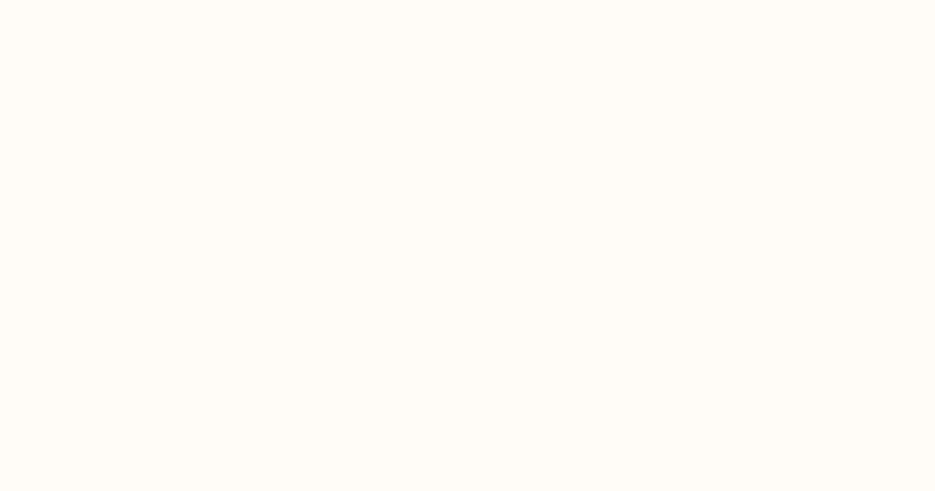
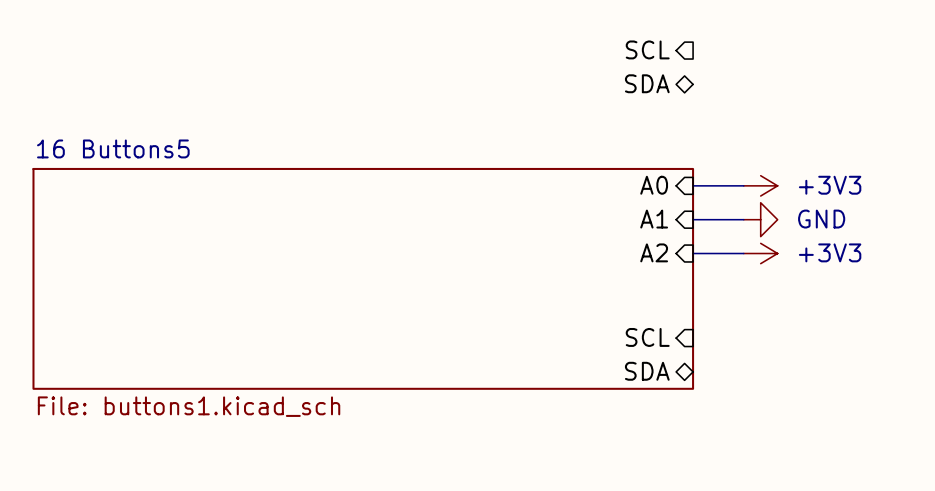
sheet pin: none -> SCL (647, 49)
sheet pin: none -> SDA (647, 83)
sheet pin: none -> A0 (654, 185)
wire: none -> (693, 185) (743, 185)
power symbol: none -> +3V3 (760, 185)
sheet pin: none -> A1 (654, 219)
wire: none -> (693, 219) (743, 219)
power symbol: none -> GND (760, 219)
sheet pin: none -> A2 (654, 252)
wire: none -> (693, 253) (743, 253)
power symbol: none -> +3V3 (760, 253)
sheet 16 Buttons5: none -> File: buttons1.kicad_sch (363, 278)
sheet pin: none -> SCL (647, 337)
sheet pin: none -> SDA (647, 371)

